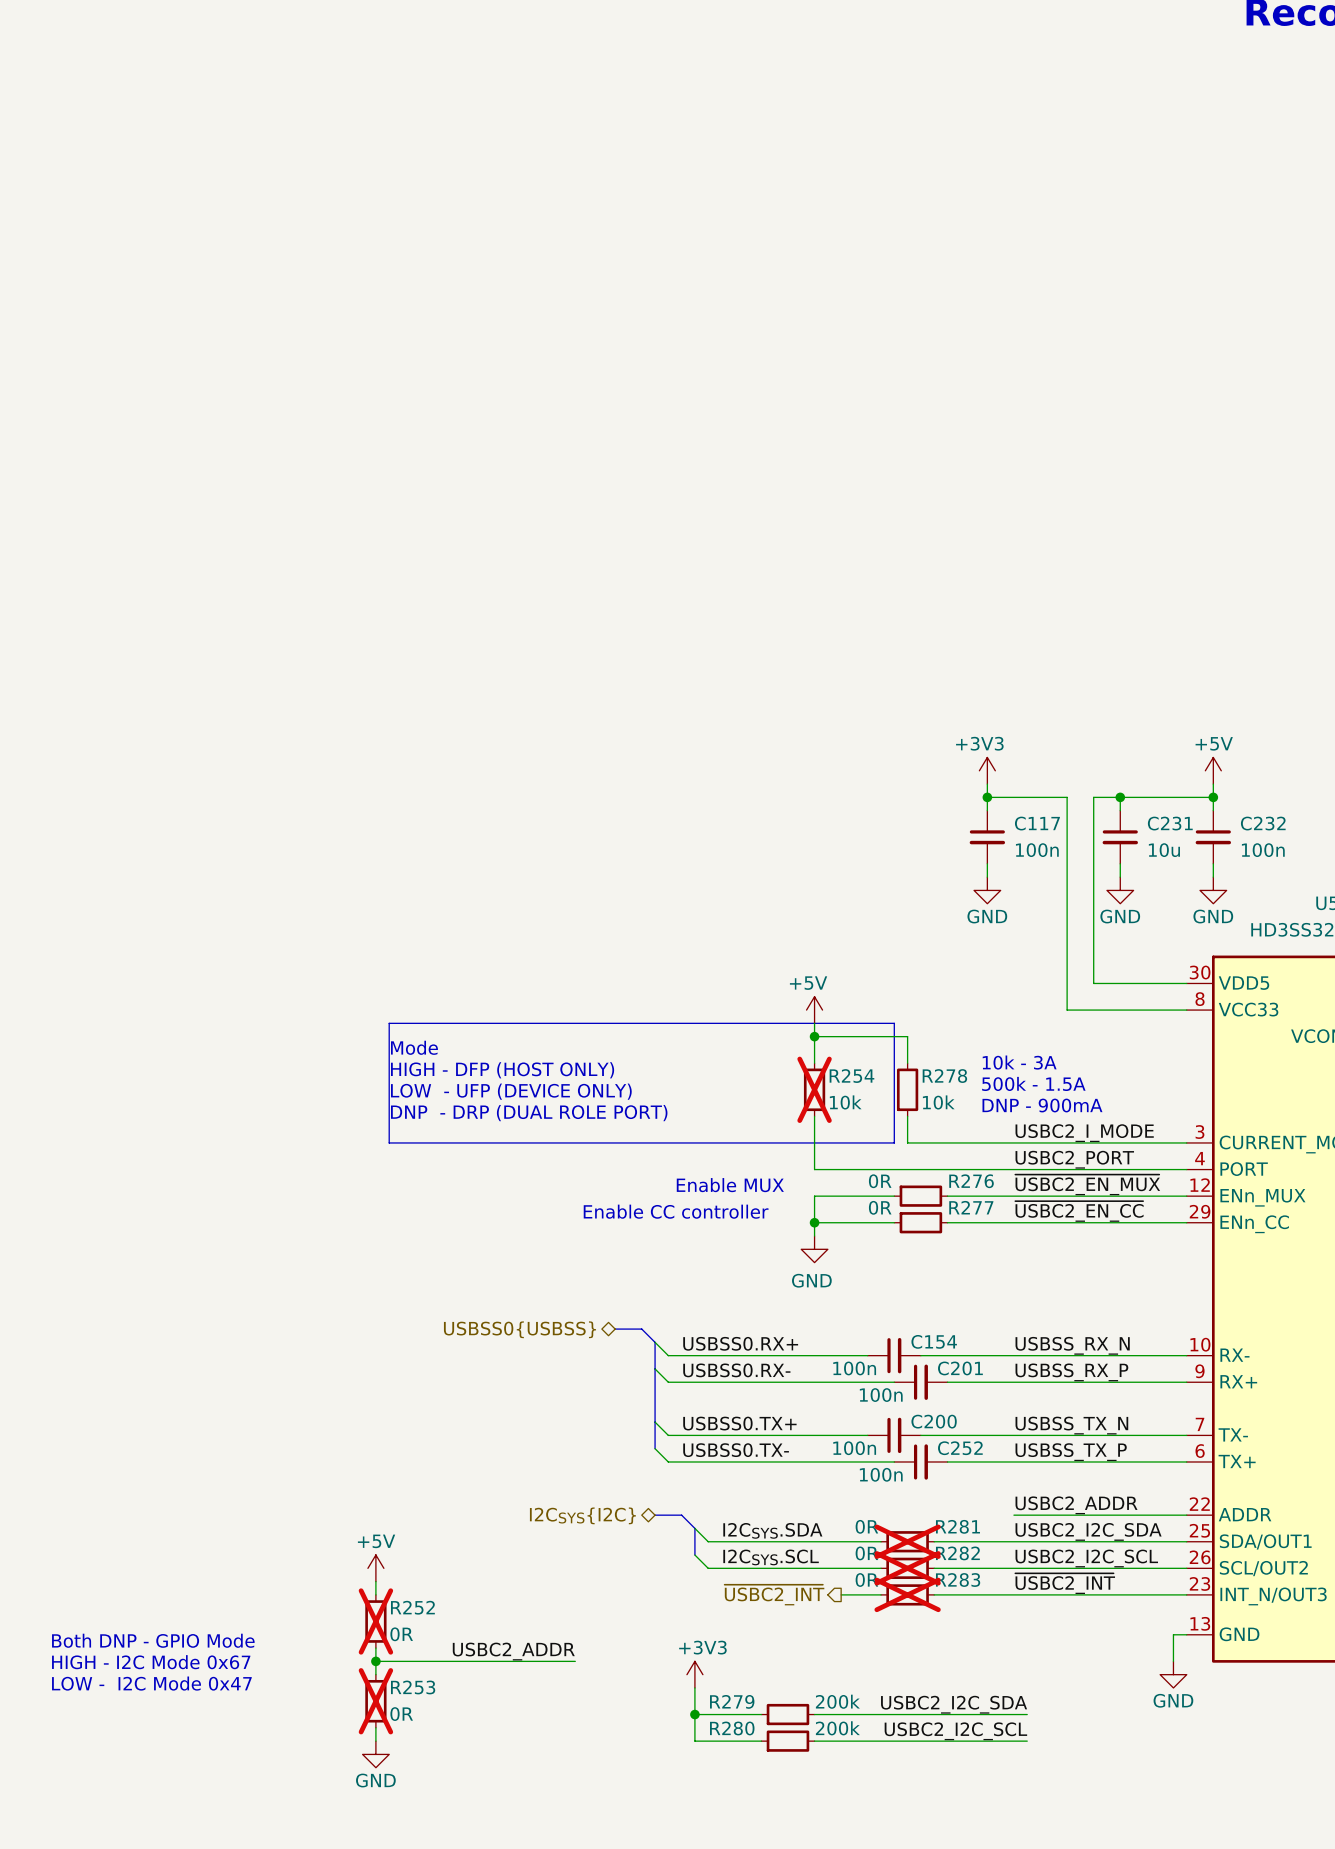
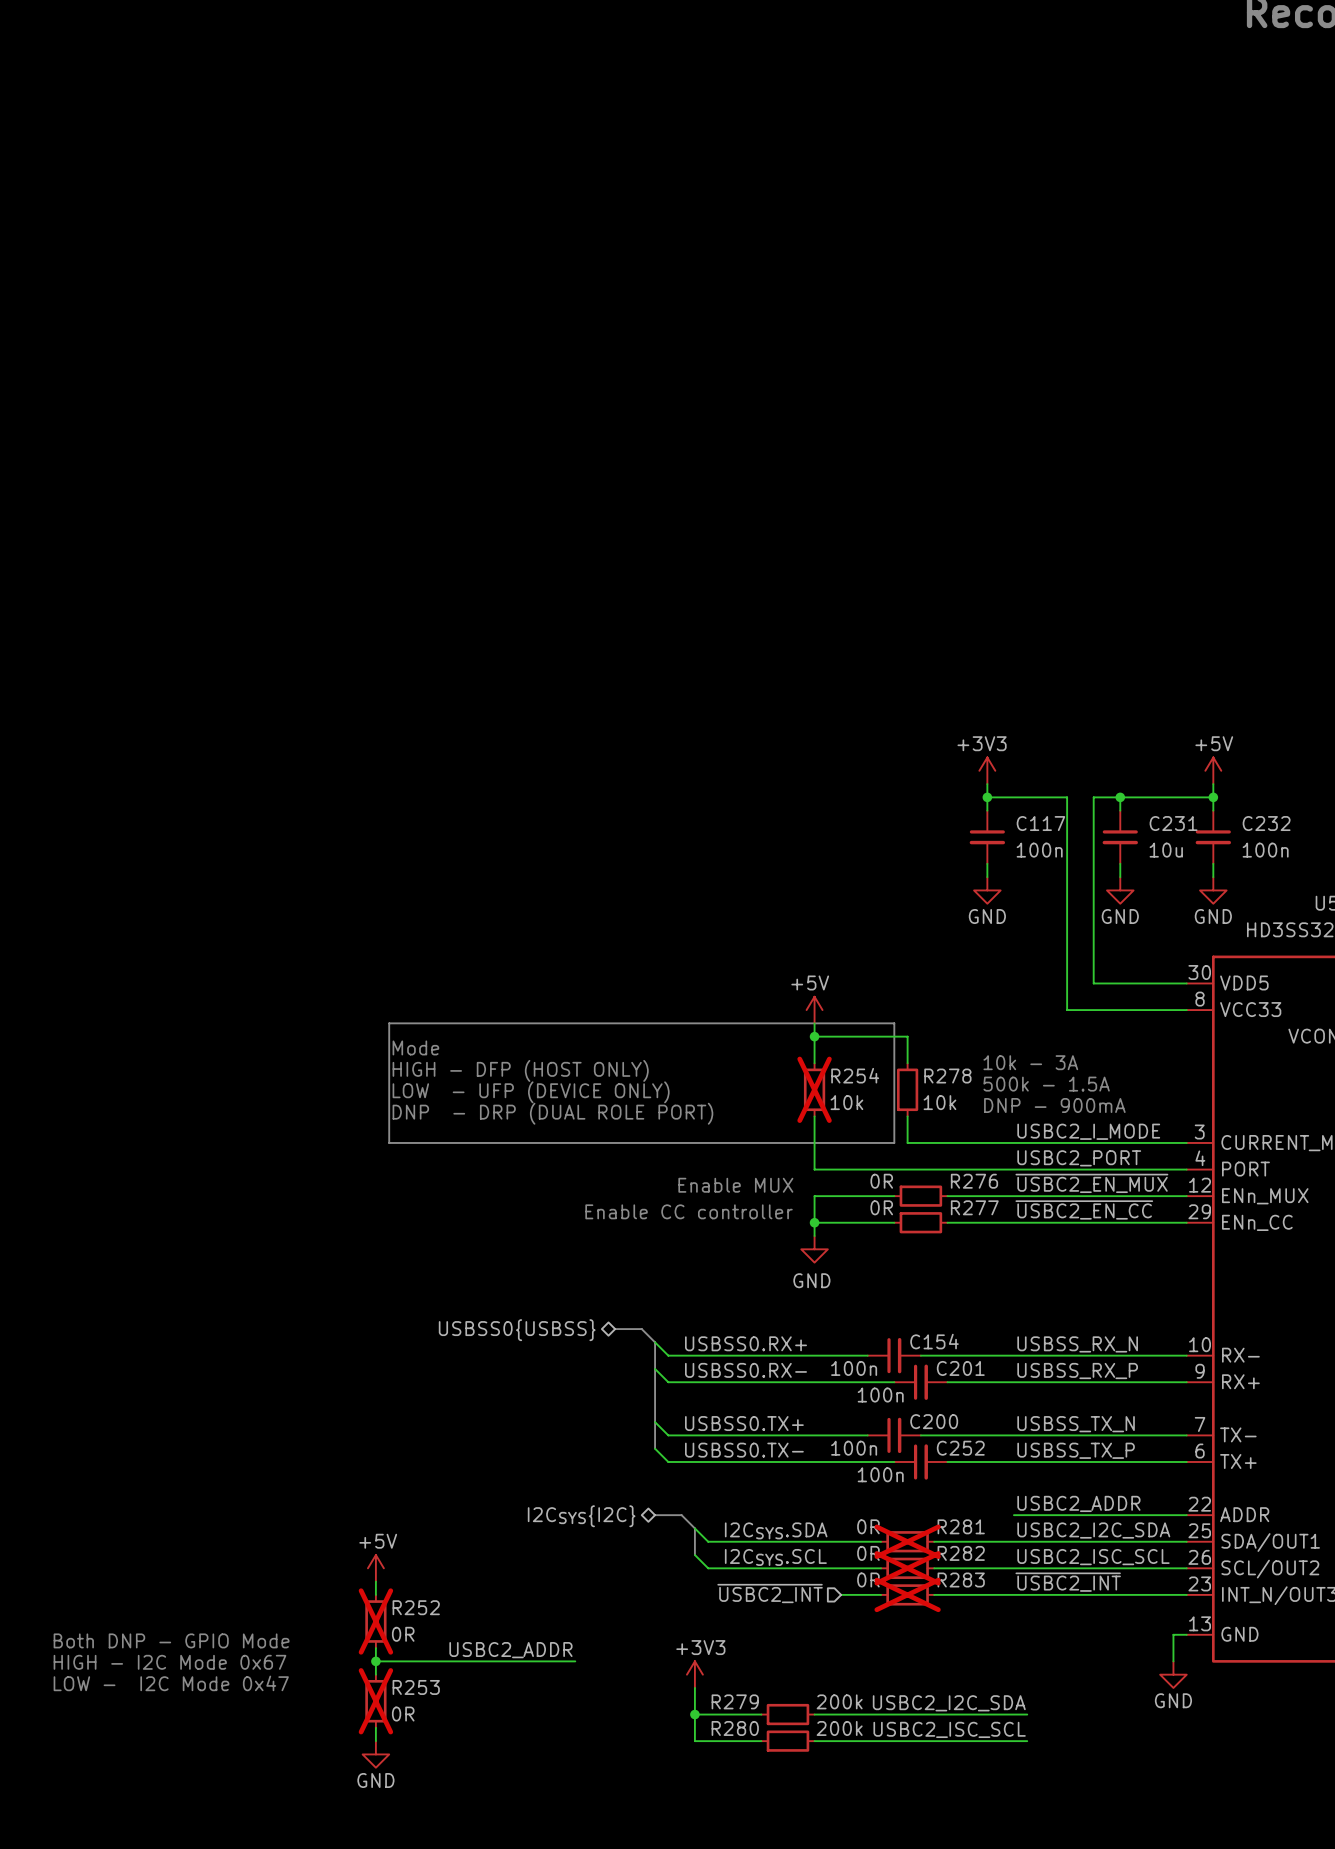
label: USBC2_I2C_SCL (1086, 1558) -> USBC2_ISC_SCL (1093, 1557)
hierarchical label shape: output (774, 1595) -> input (770, 1593)
label: USBC2_I2C_SCL (955, 1731) -> USBC2_ISC_SCL (949, 1729)

